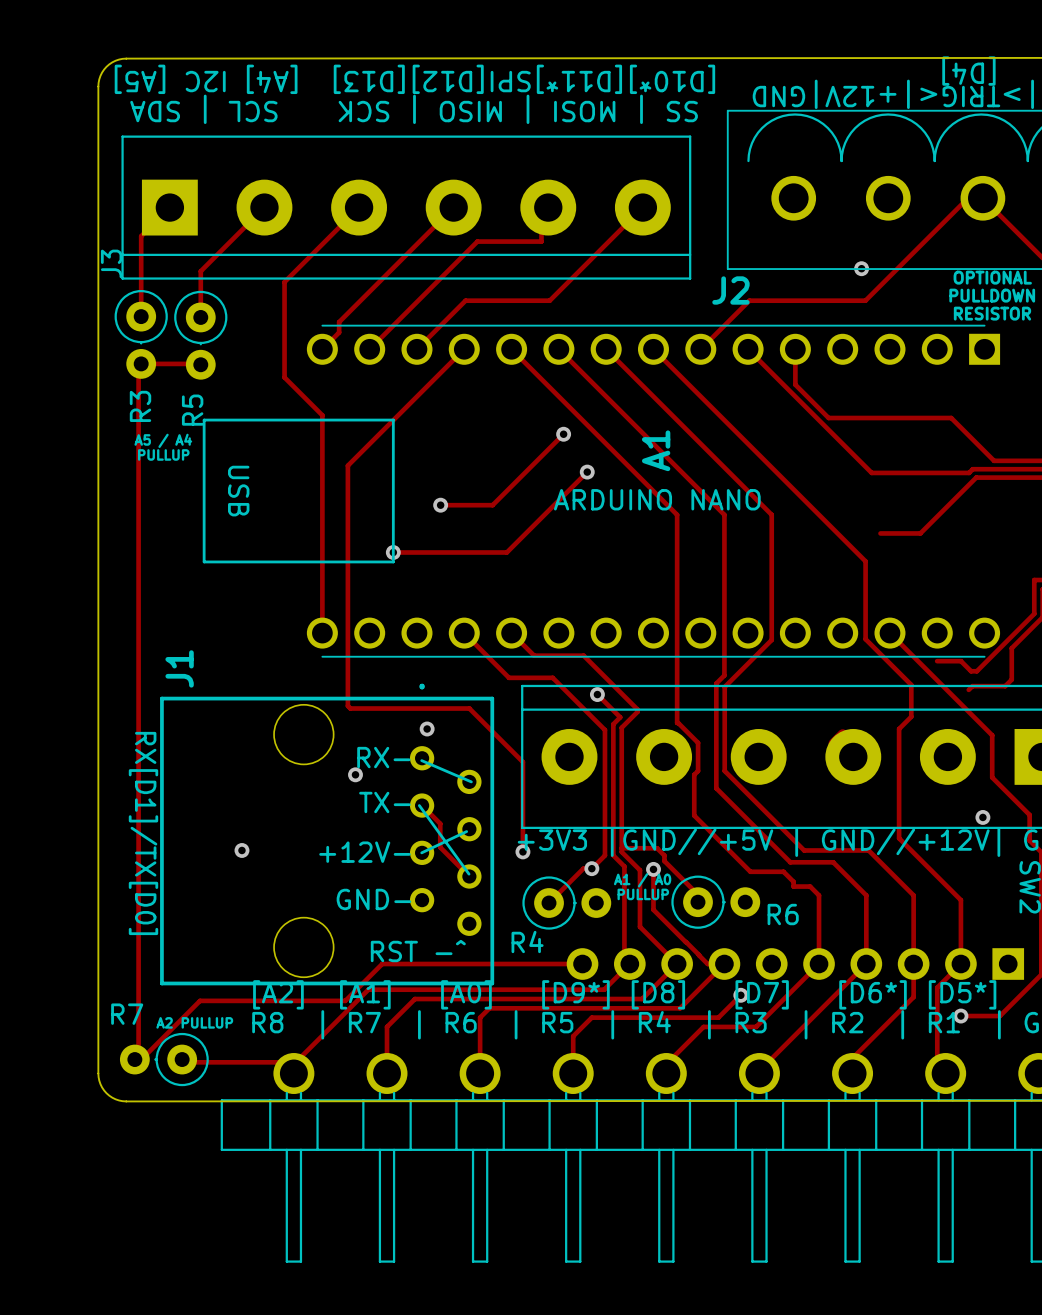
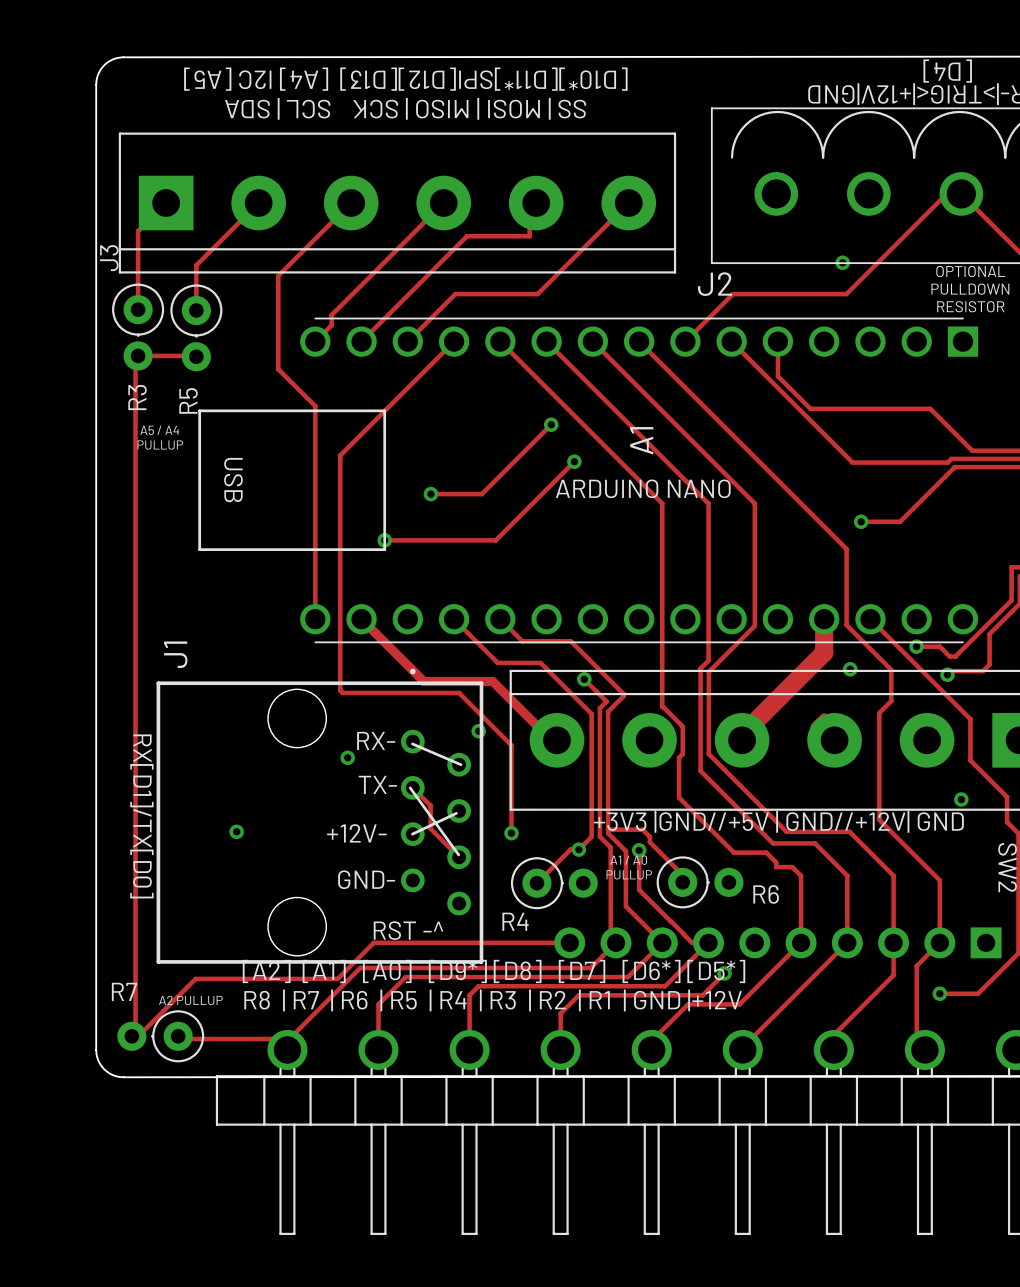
via: none -> (861, 521)
track: none -> (361, 619) (423, 681) (492, 681) (551, 740)
track: none -> (824, 619) (824, 652) (736, 740)
via: none -> (916, 646)
via: none -> (850, 669)
via: none -> (947, 674)
via position: (427, 728) -> (478, 731)

